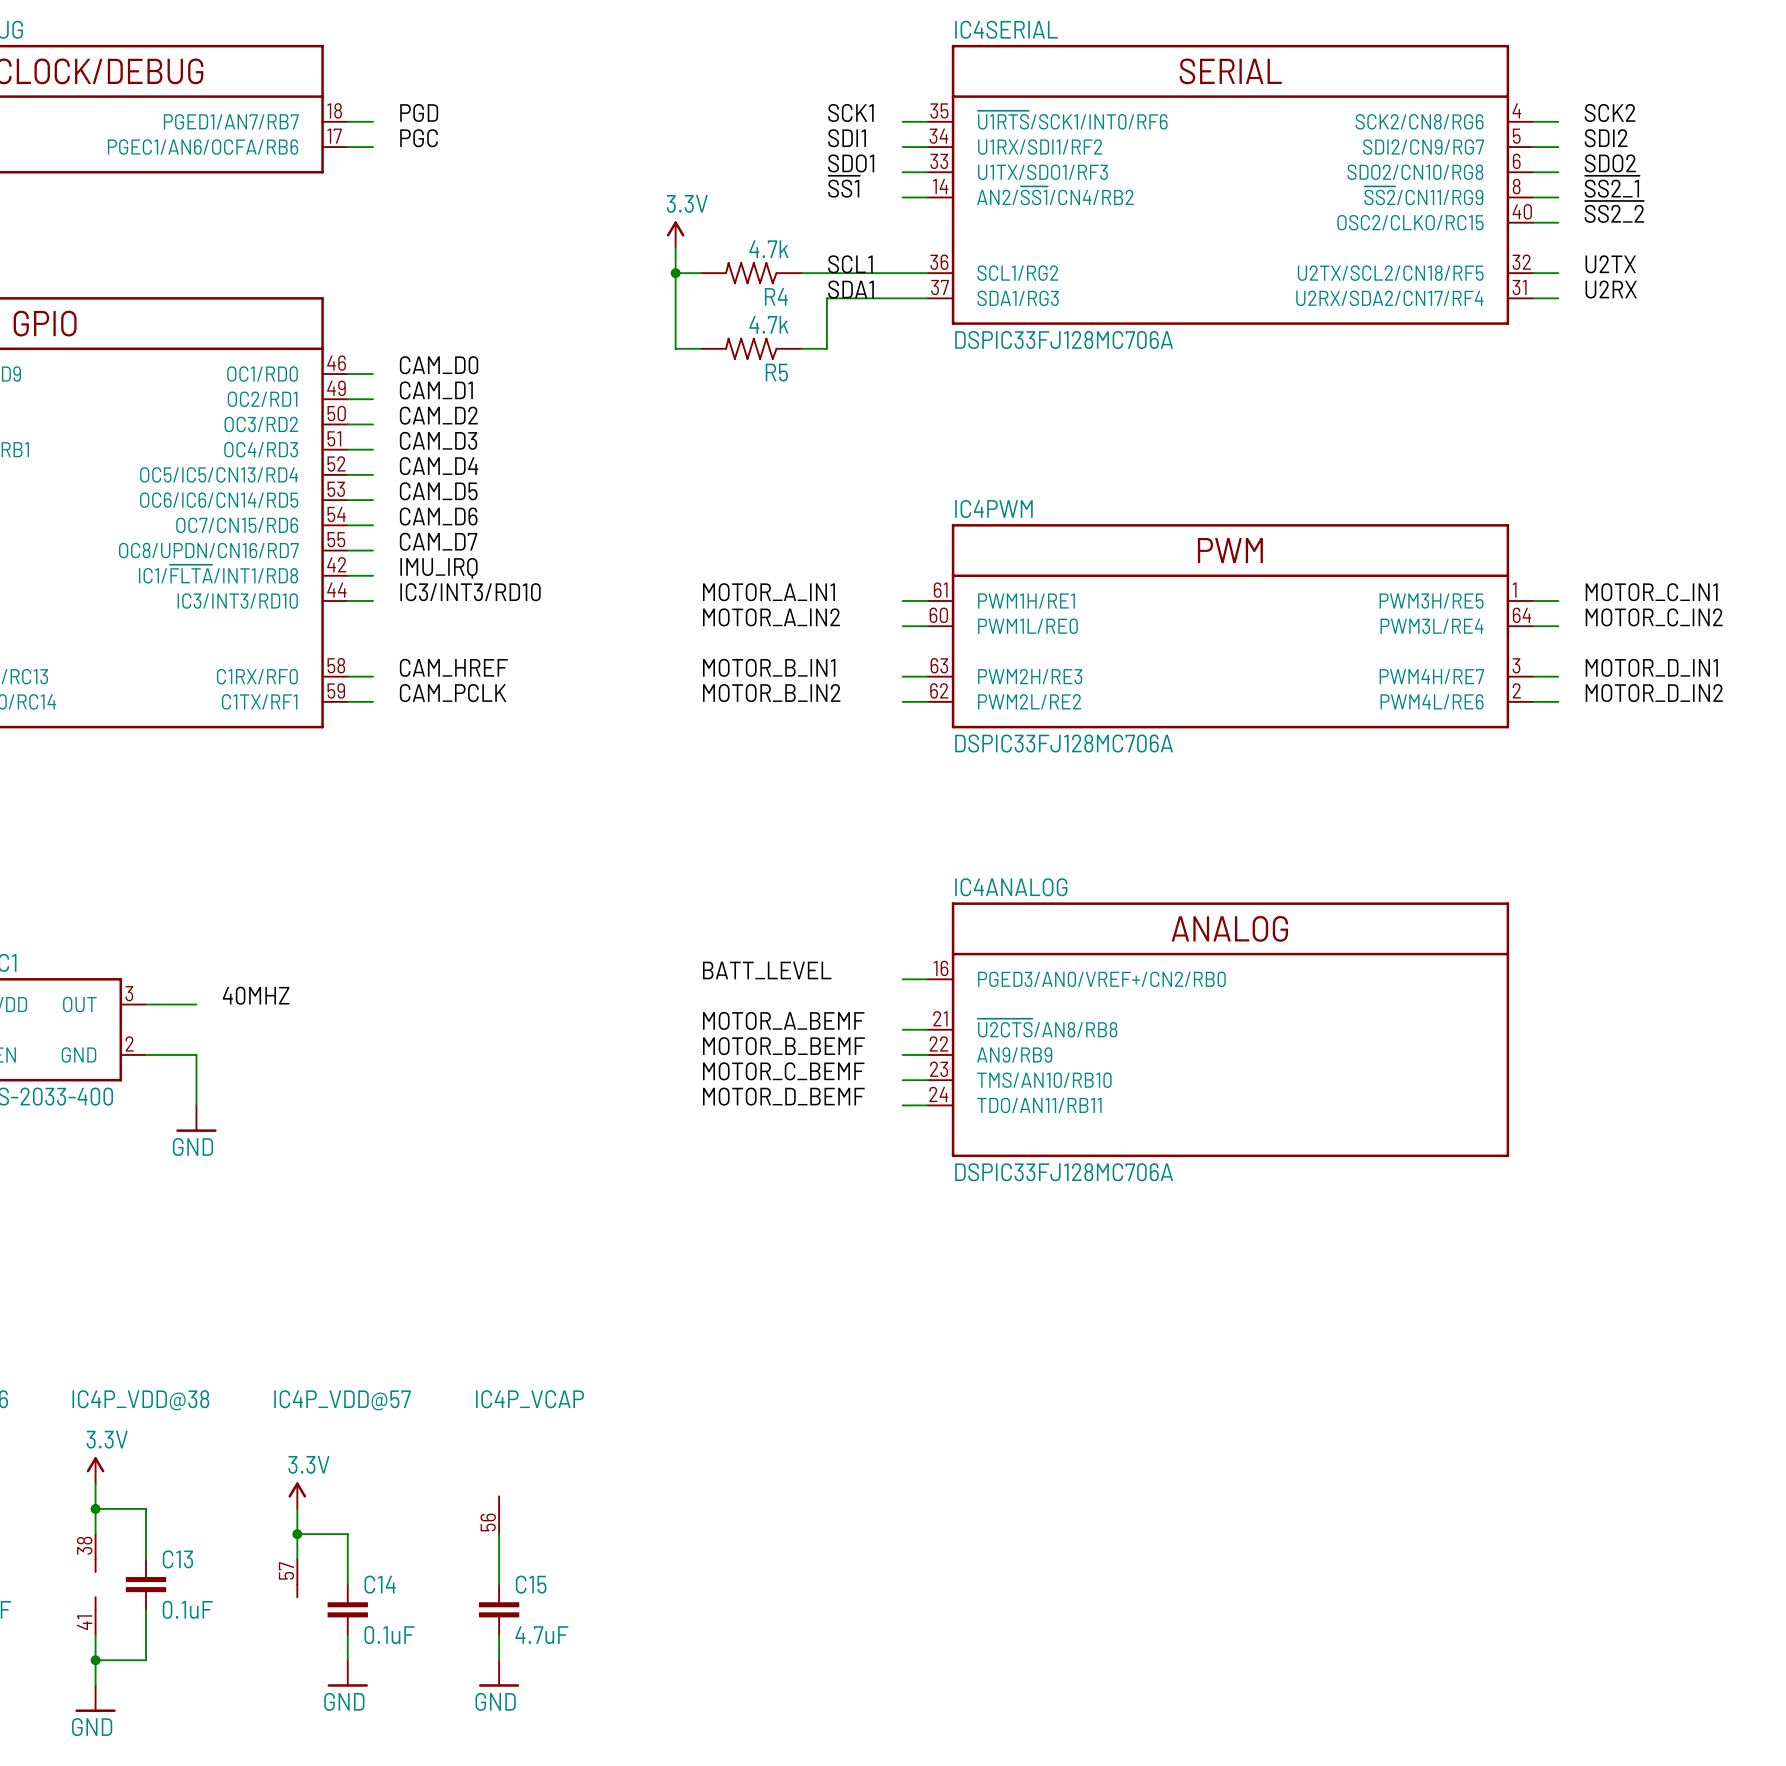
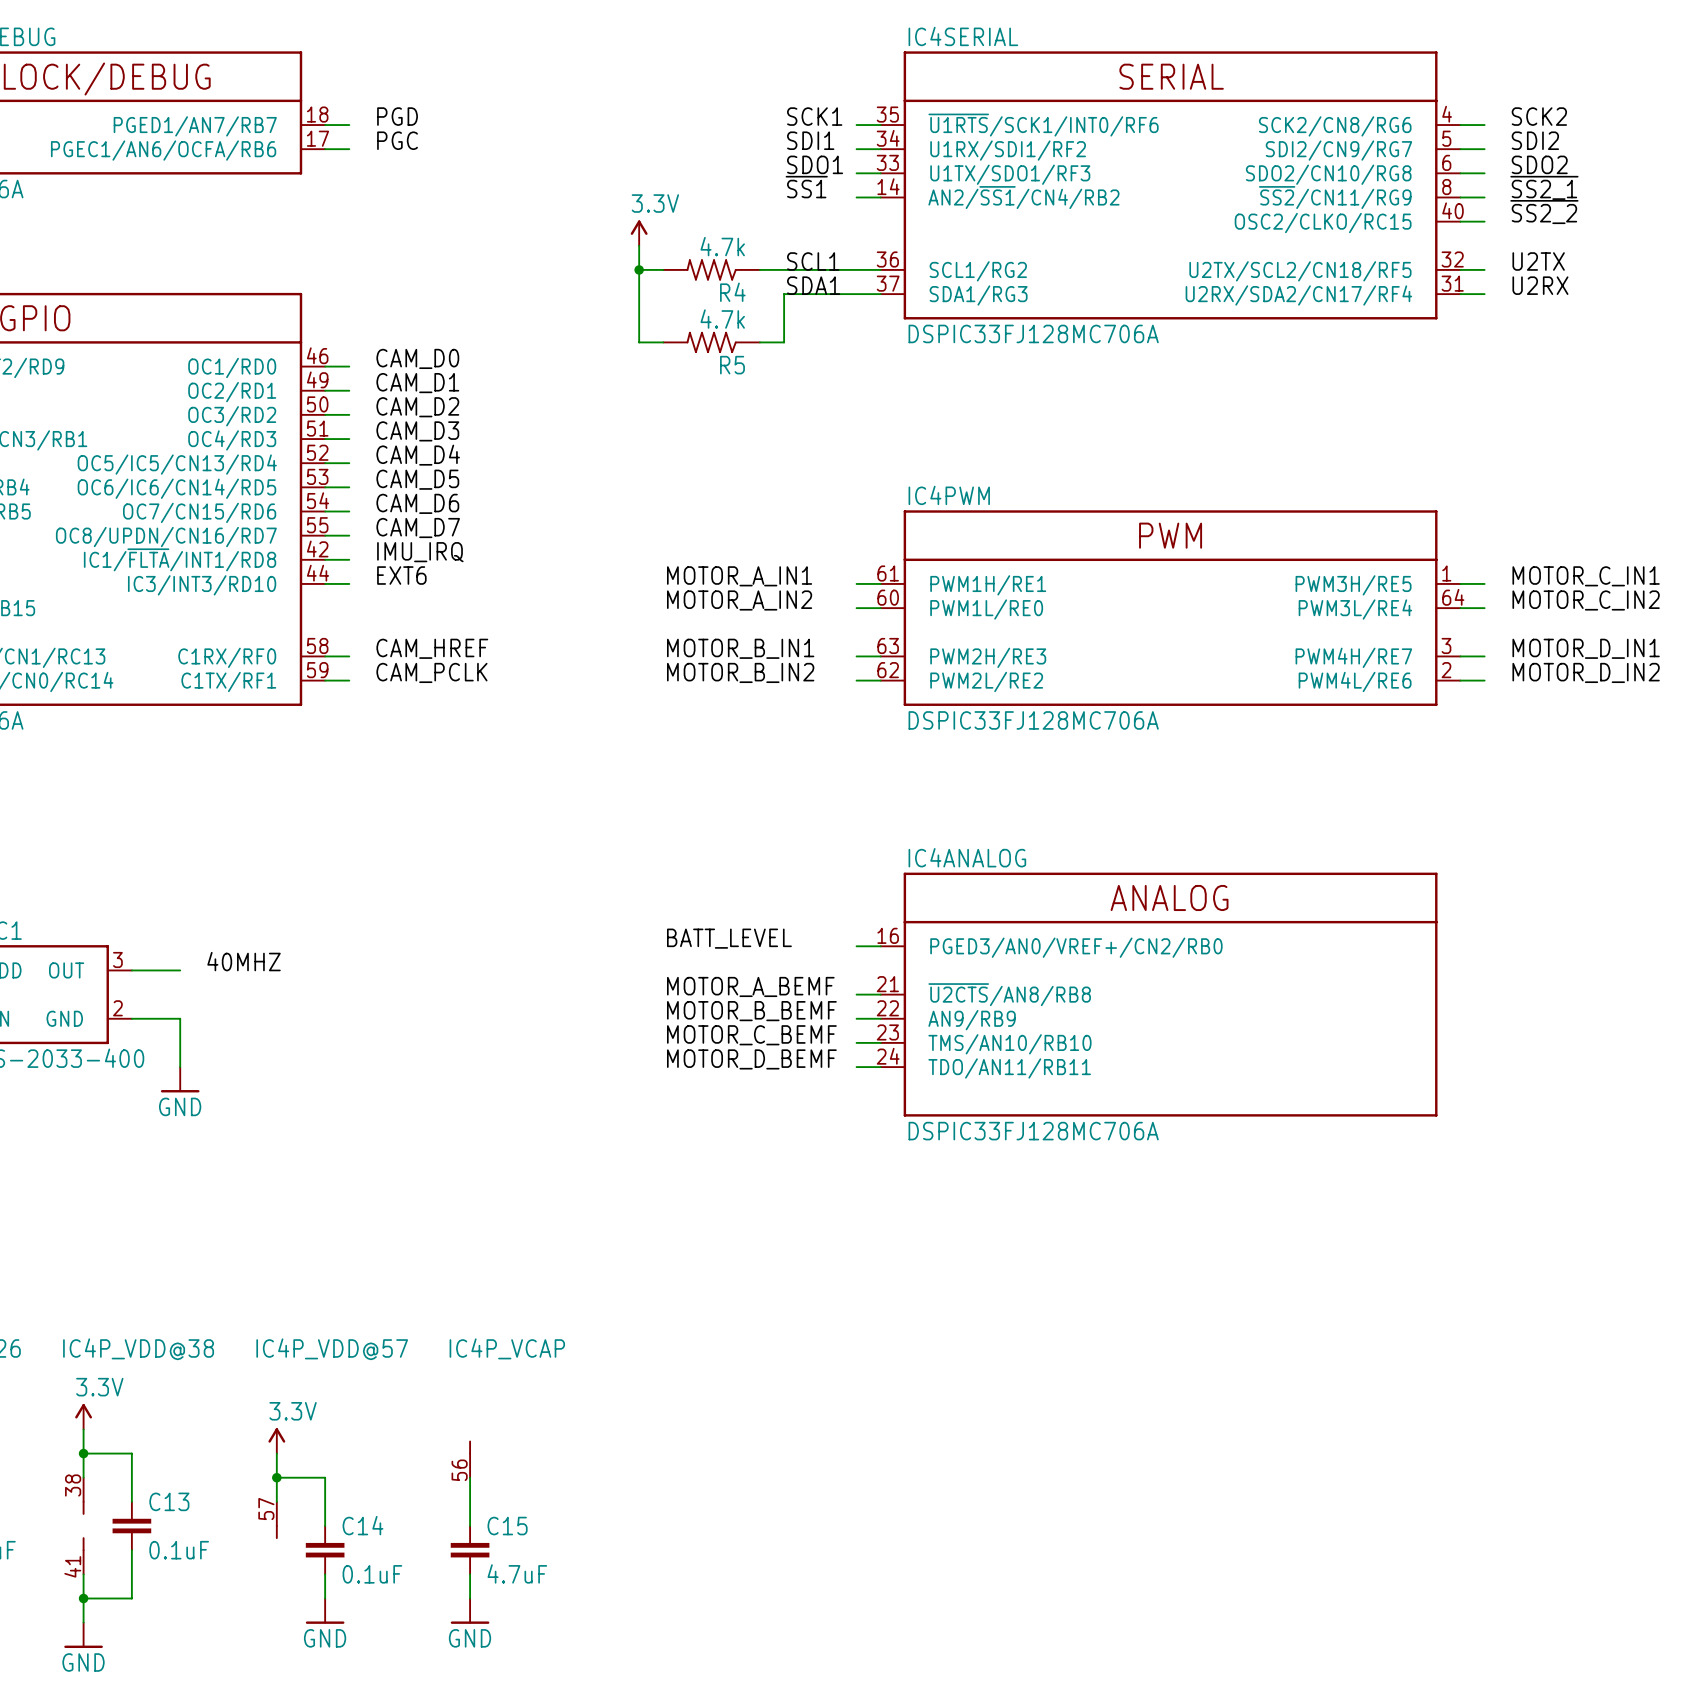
label: IC3/INT3/RD10 (470, 592) -> EXT6 (401, 575)

